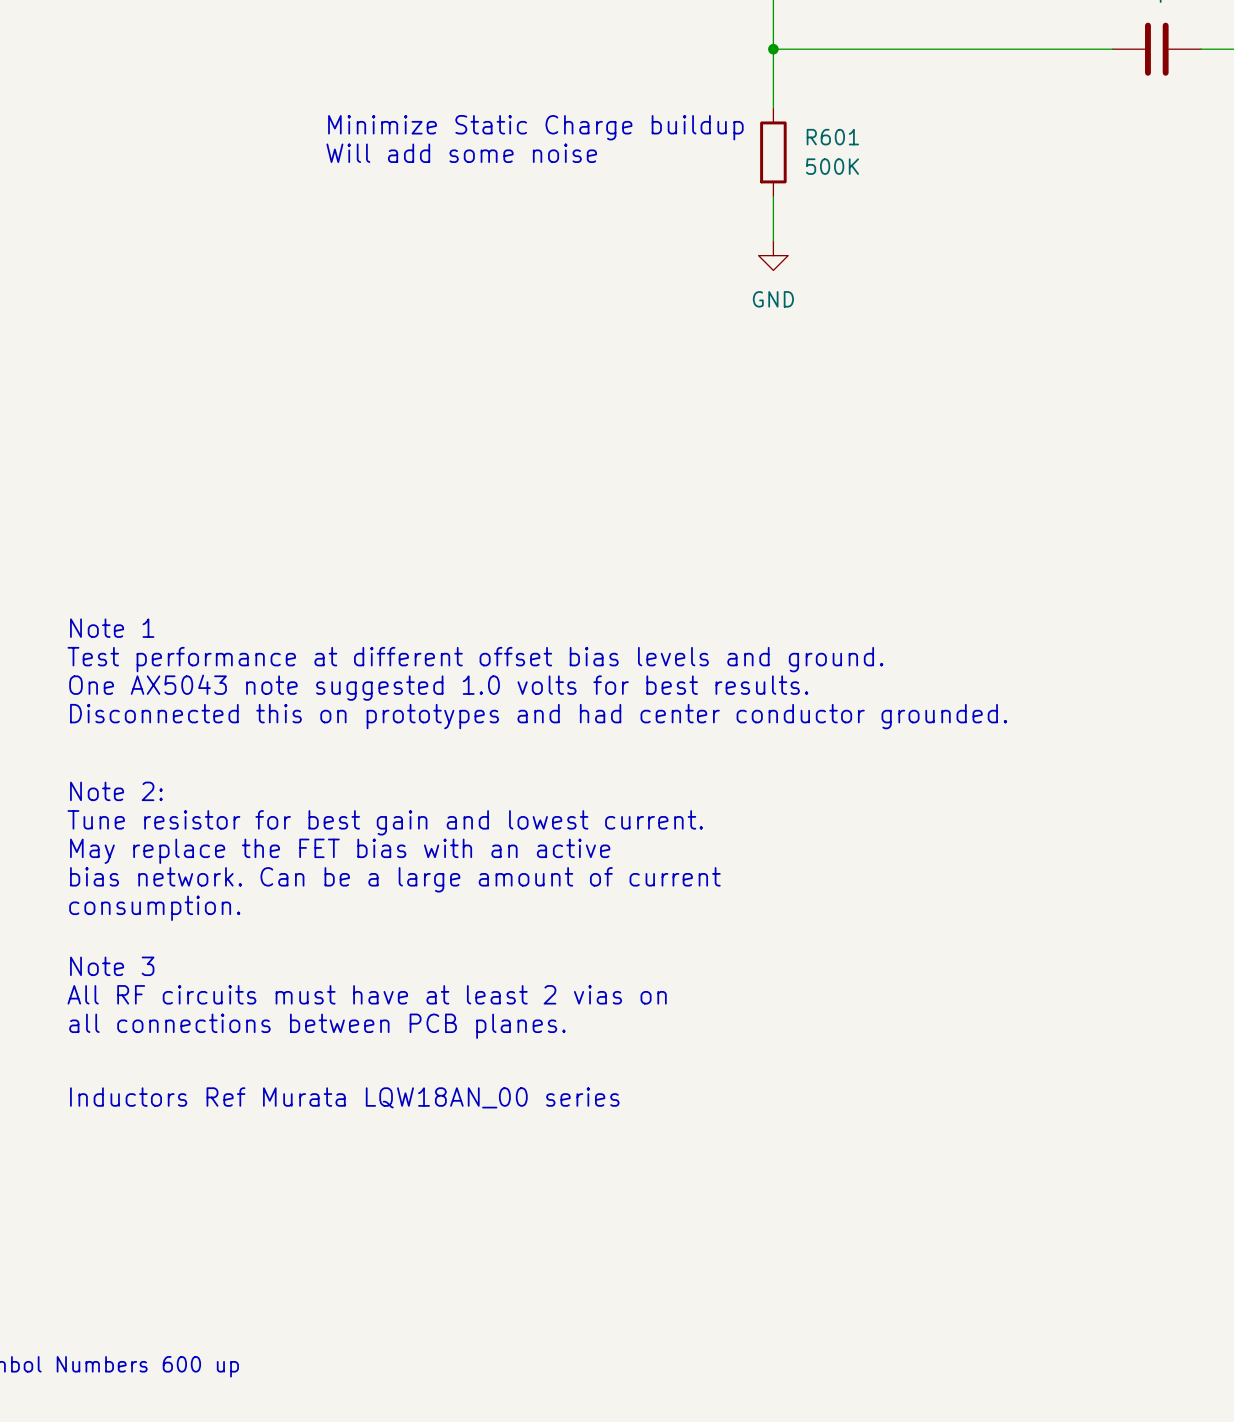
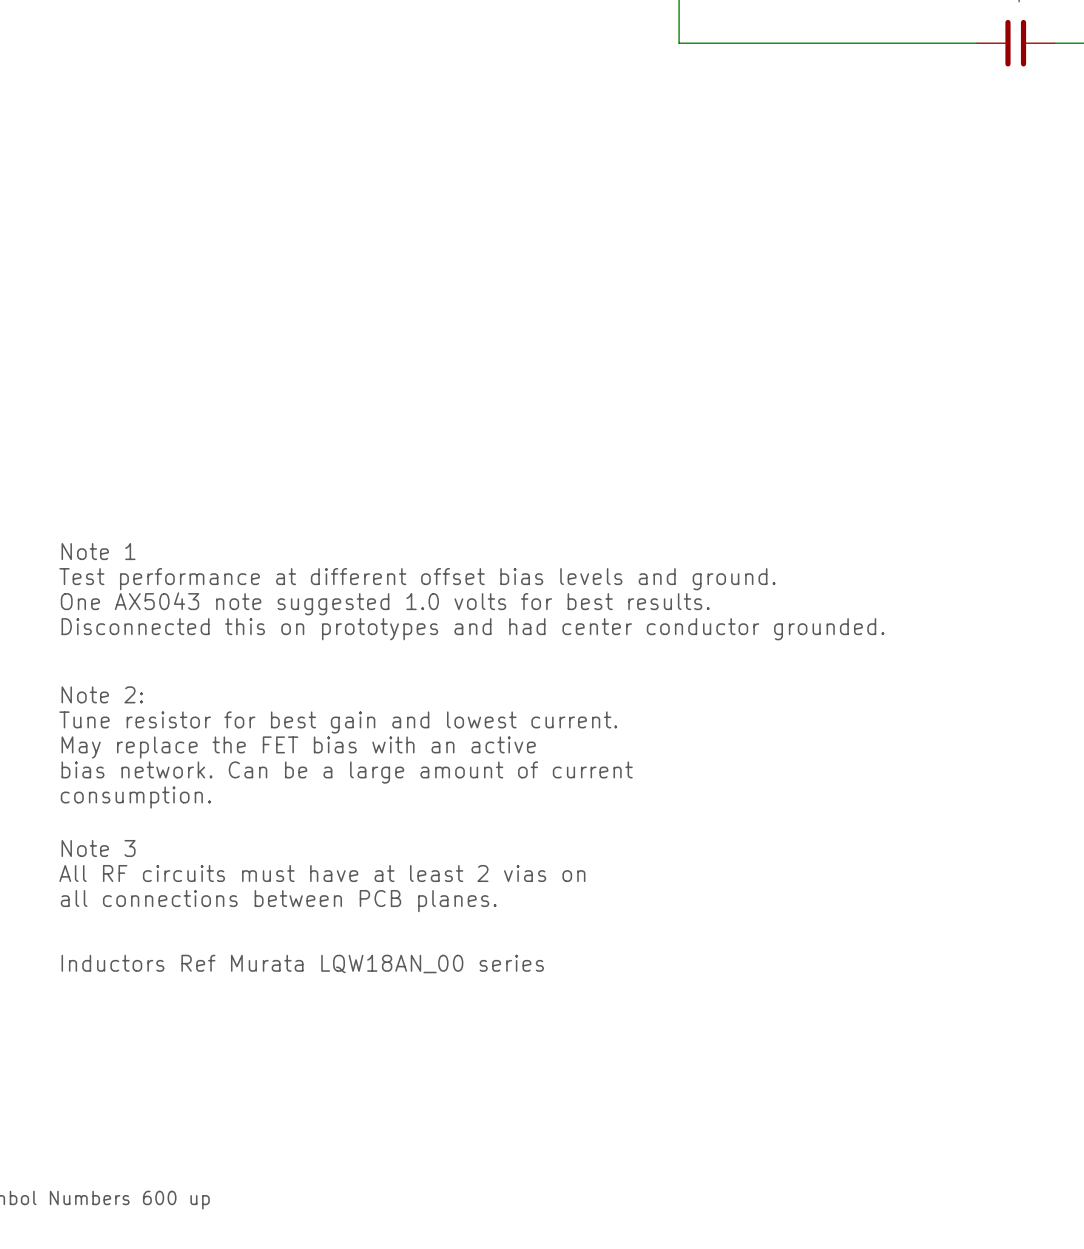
wire: (773, 49) (773, 108) -> none
junction: (773, 49) -> none
text: Minimize Static Charge buildup (535, 127) -> none
R601: 500K (773, 152) -> none
text: Will add some noise (461, 153) -> none
wire: (773, 196) (773, 240) -> none
power symbol: GND (773, 255) -> none

